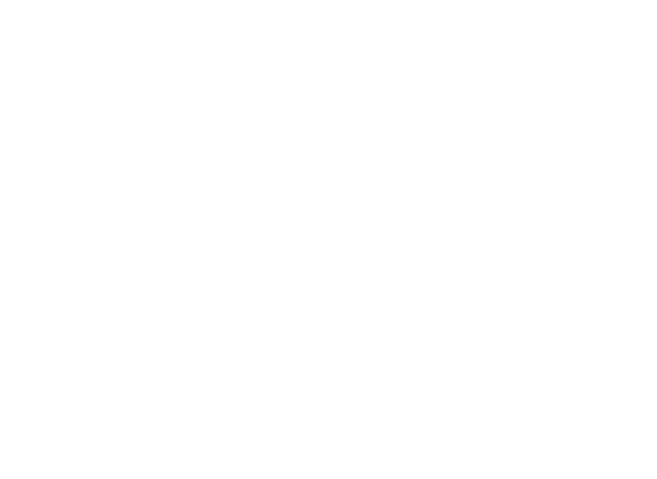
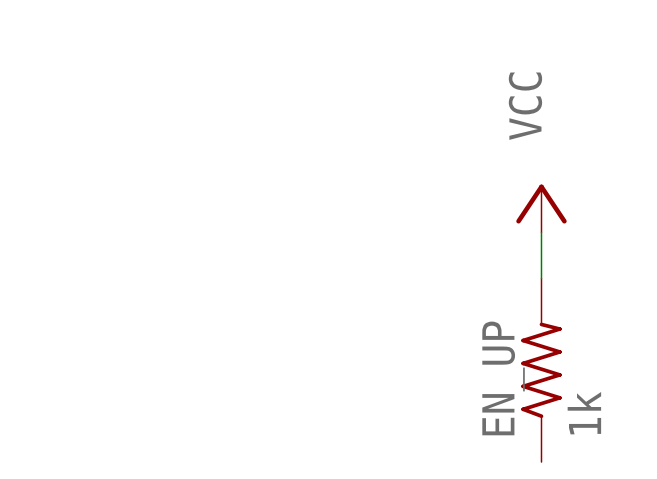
power symbol: none -> VCC (541, 208)
wire: none -> (541, 232) (541, 278)
EN_UP: none -> 1k (541, 370)

